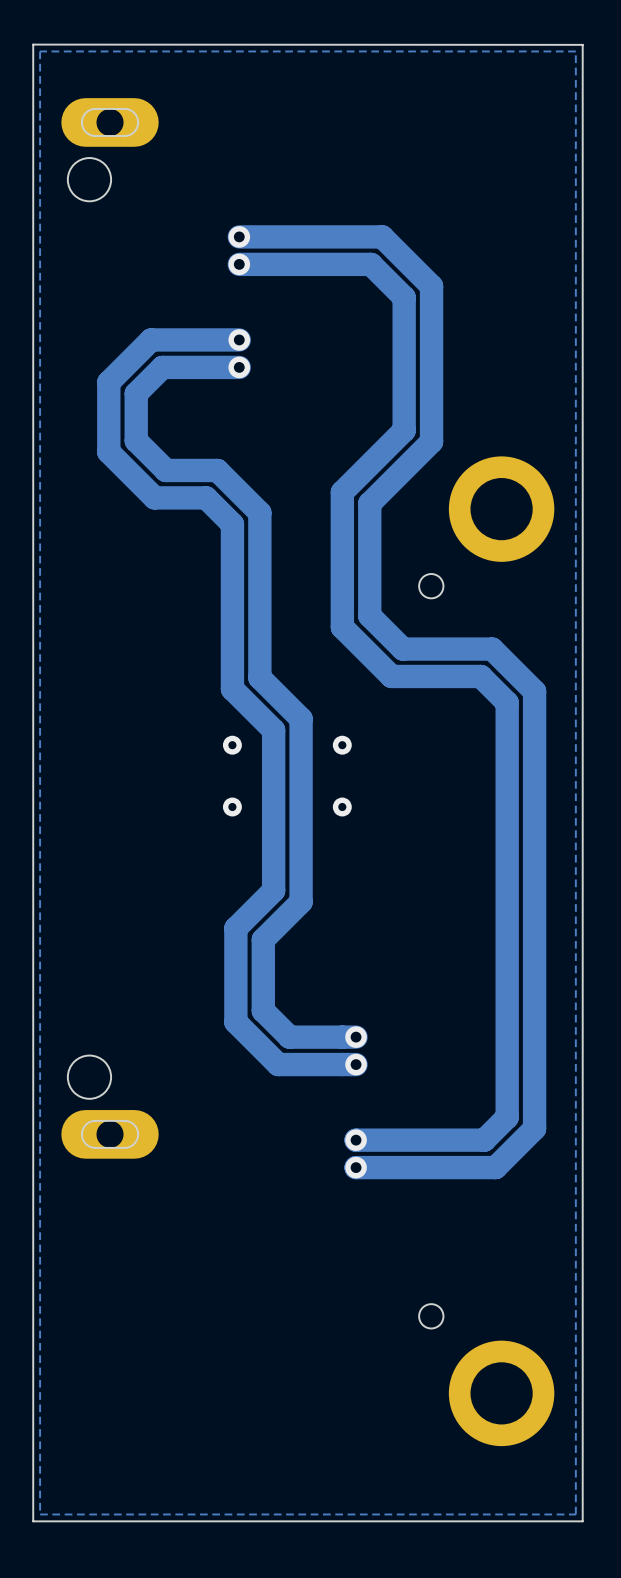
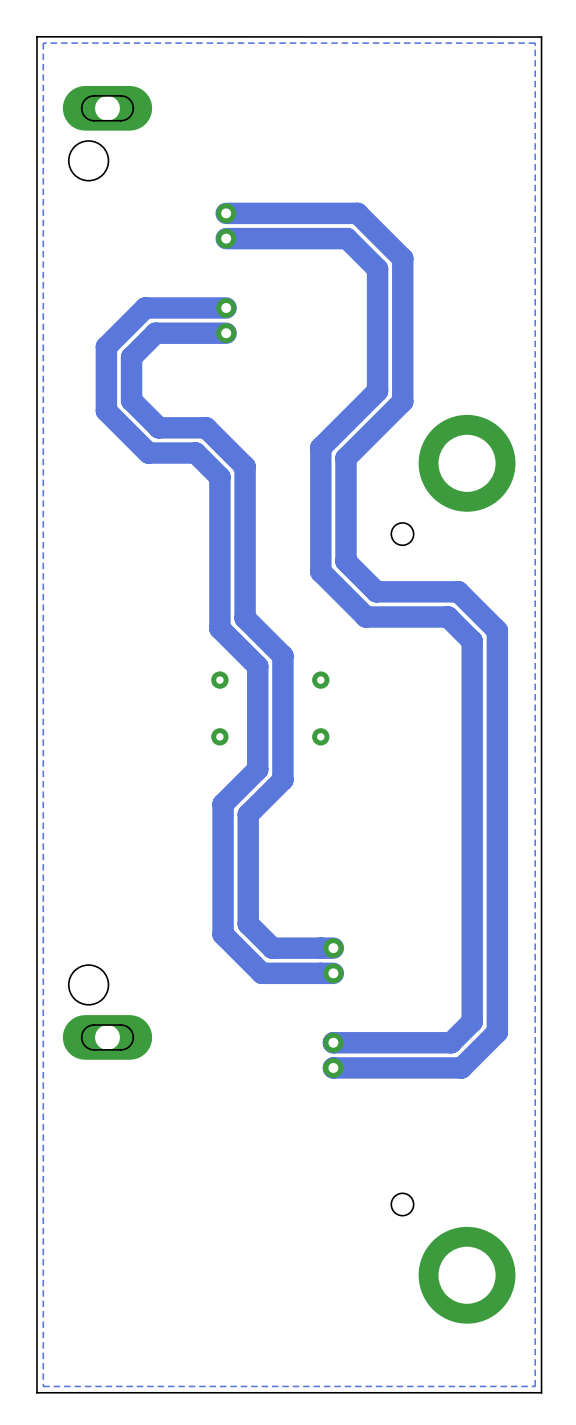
track: (273, 842) (273, 890) (235, 928) -> (257, 769) (223, 804) (223, 848)
track: (301, 853) (301, 901) (263, 939) -> (282, 779) (248, 814) (248, 858)

